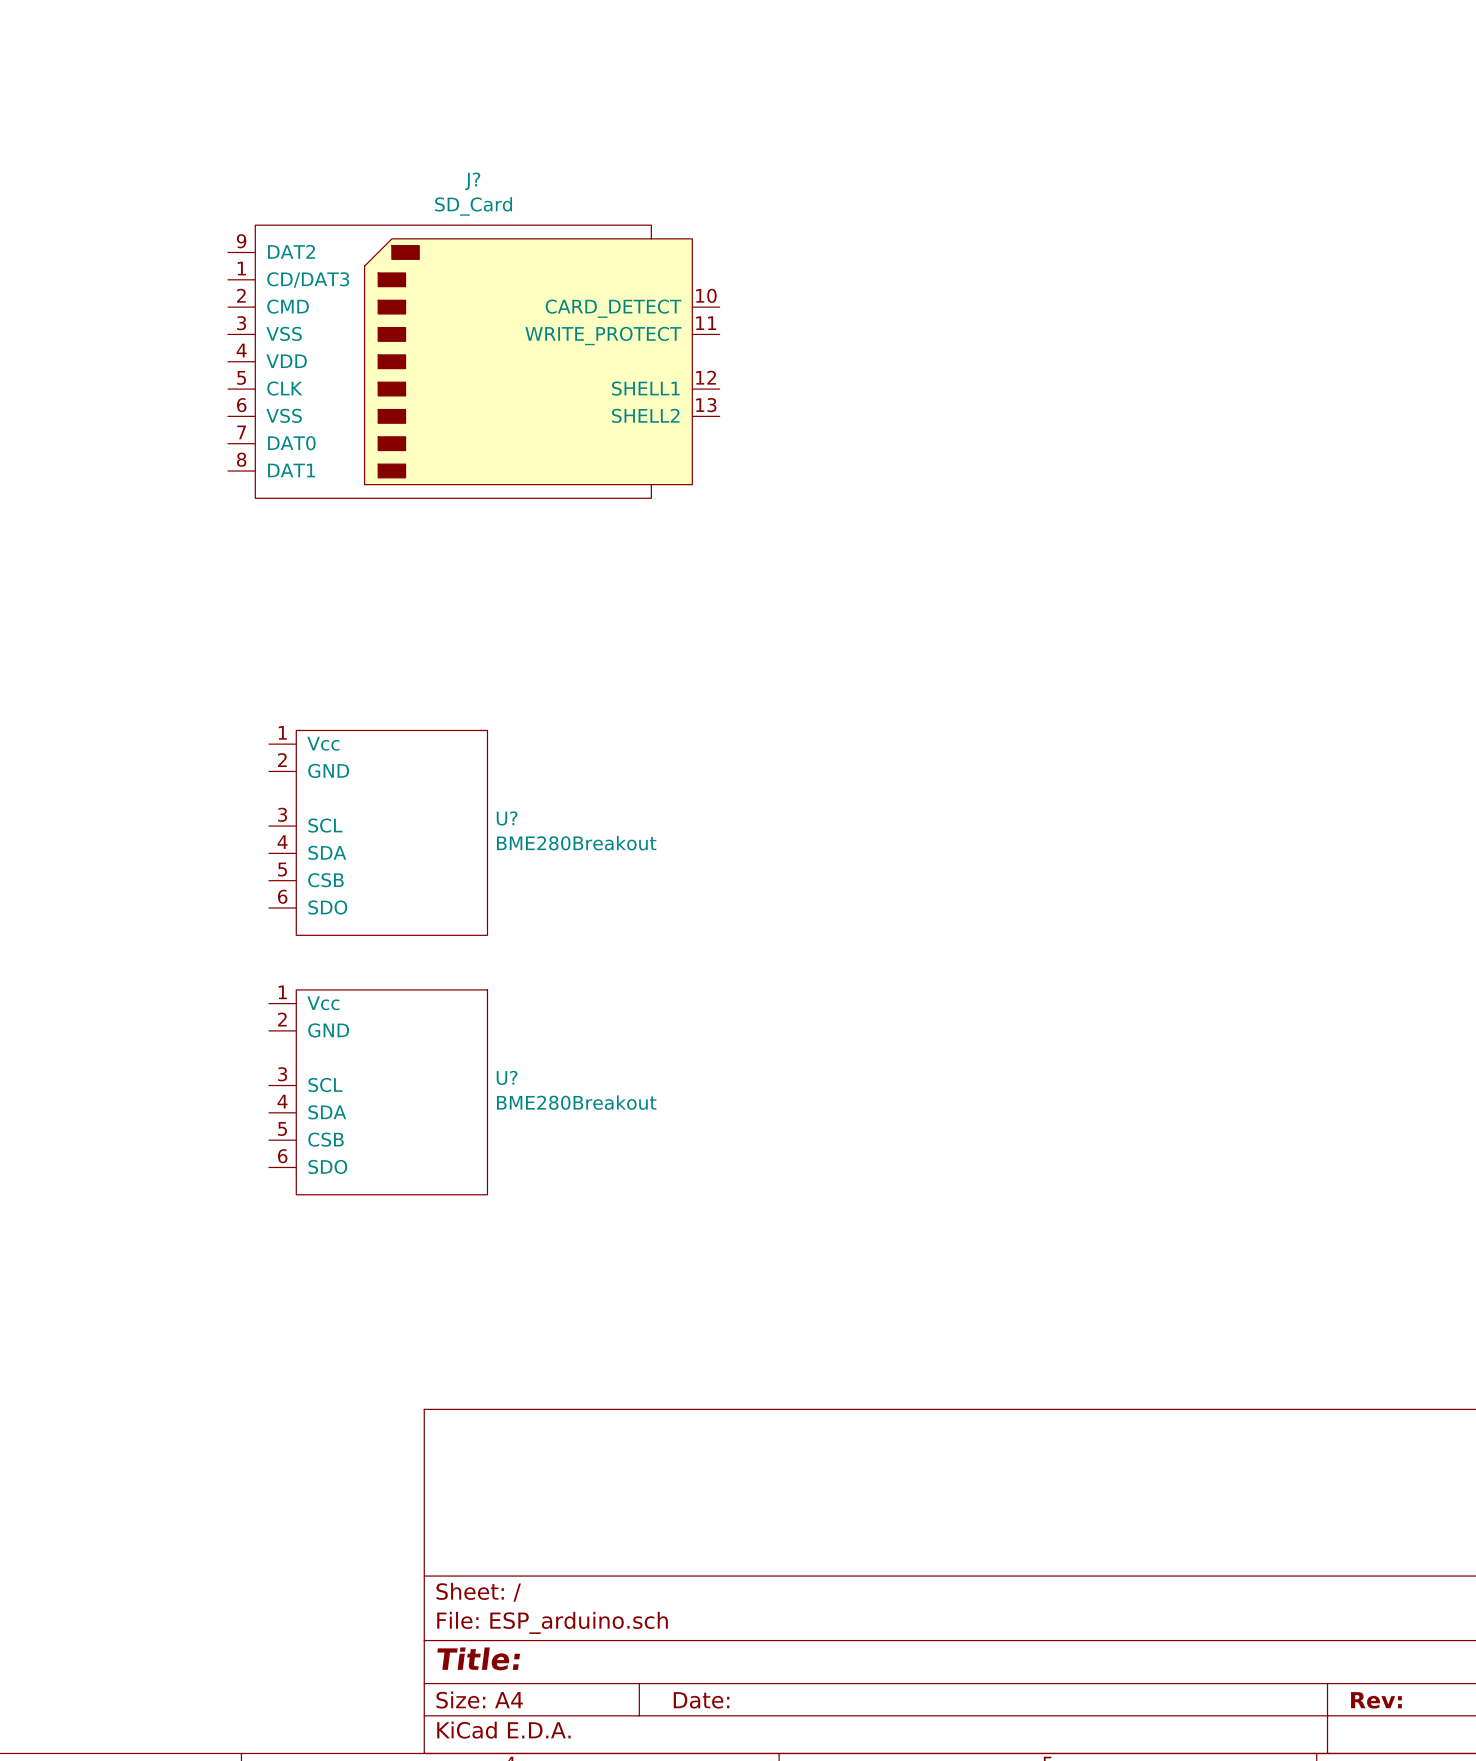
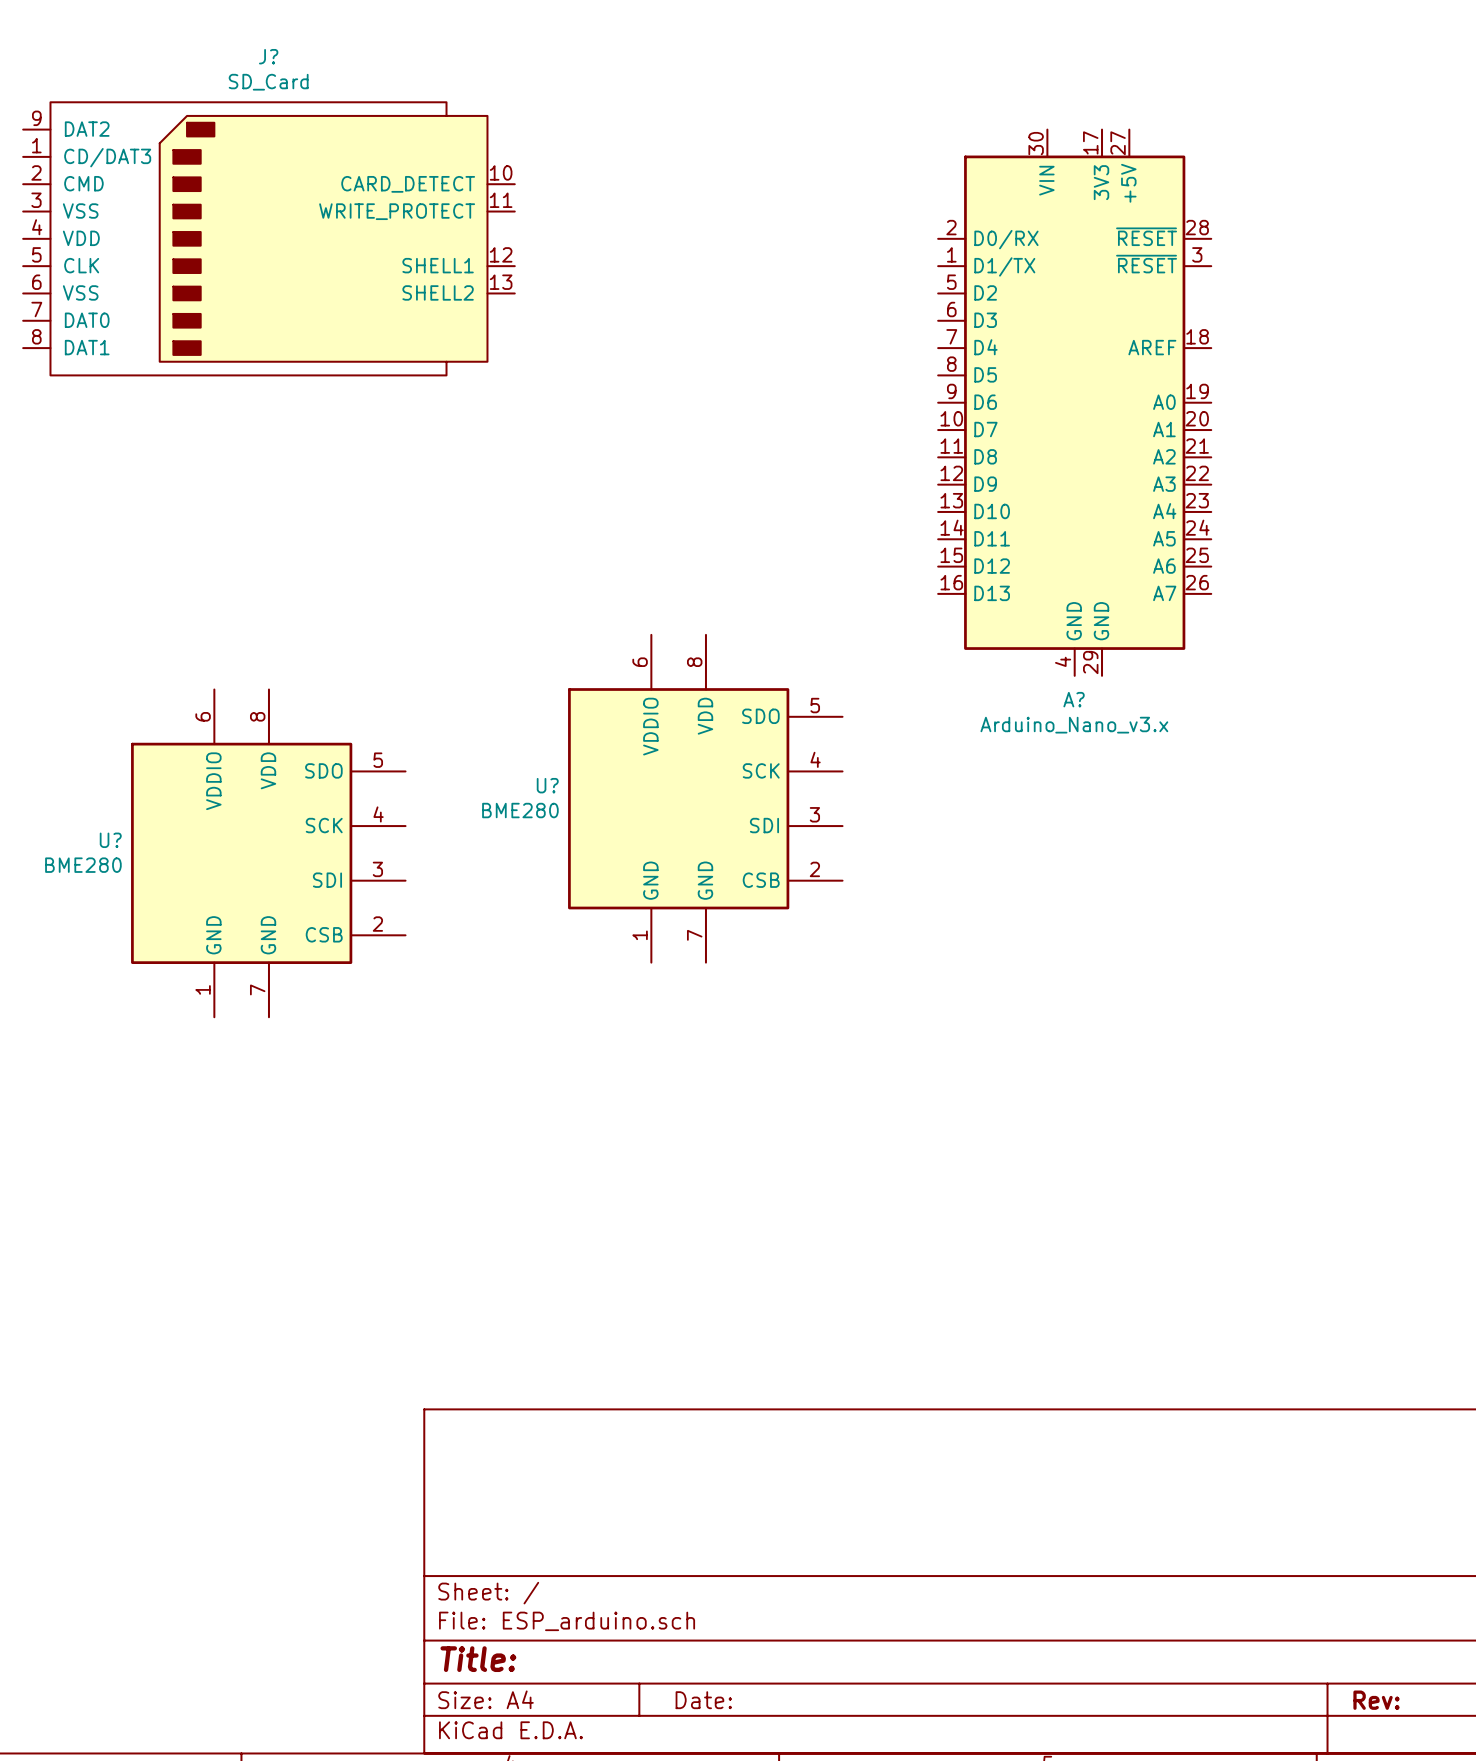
J? position: (473, 361) -> (268, 238)
A?: none -> Arduino_Nano_v3.x (1074, 402)
U?: none -> BME280 (705, 798)
U?: BME280Breakout (378, 832) -> none
U?: none -> BME280 (268, 853)
U?: BME280Breakout (378, 1092) -> none

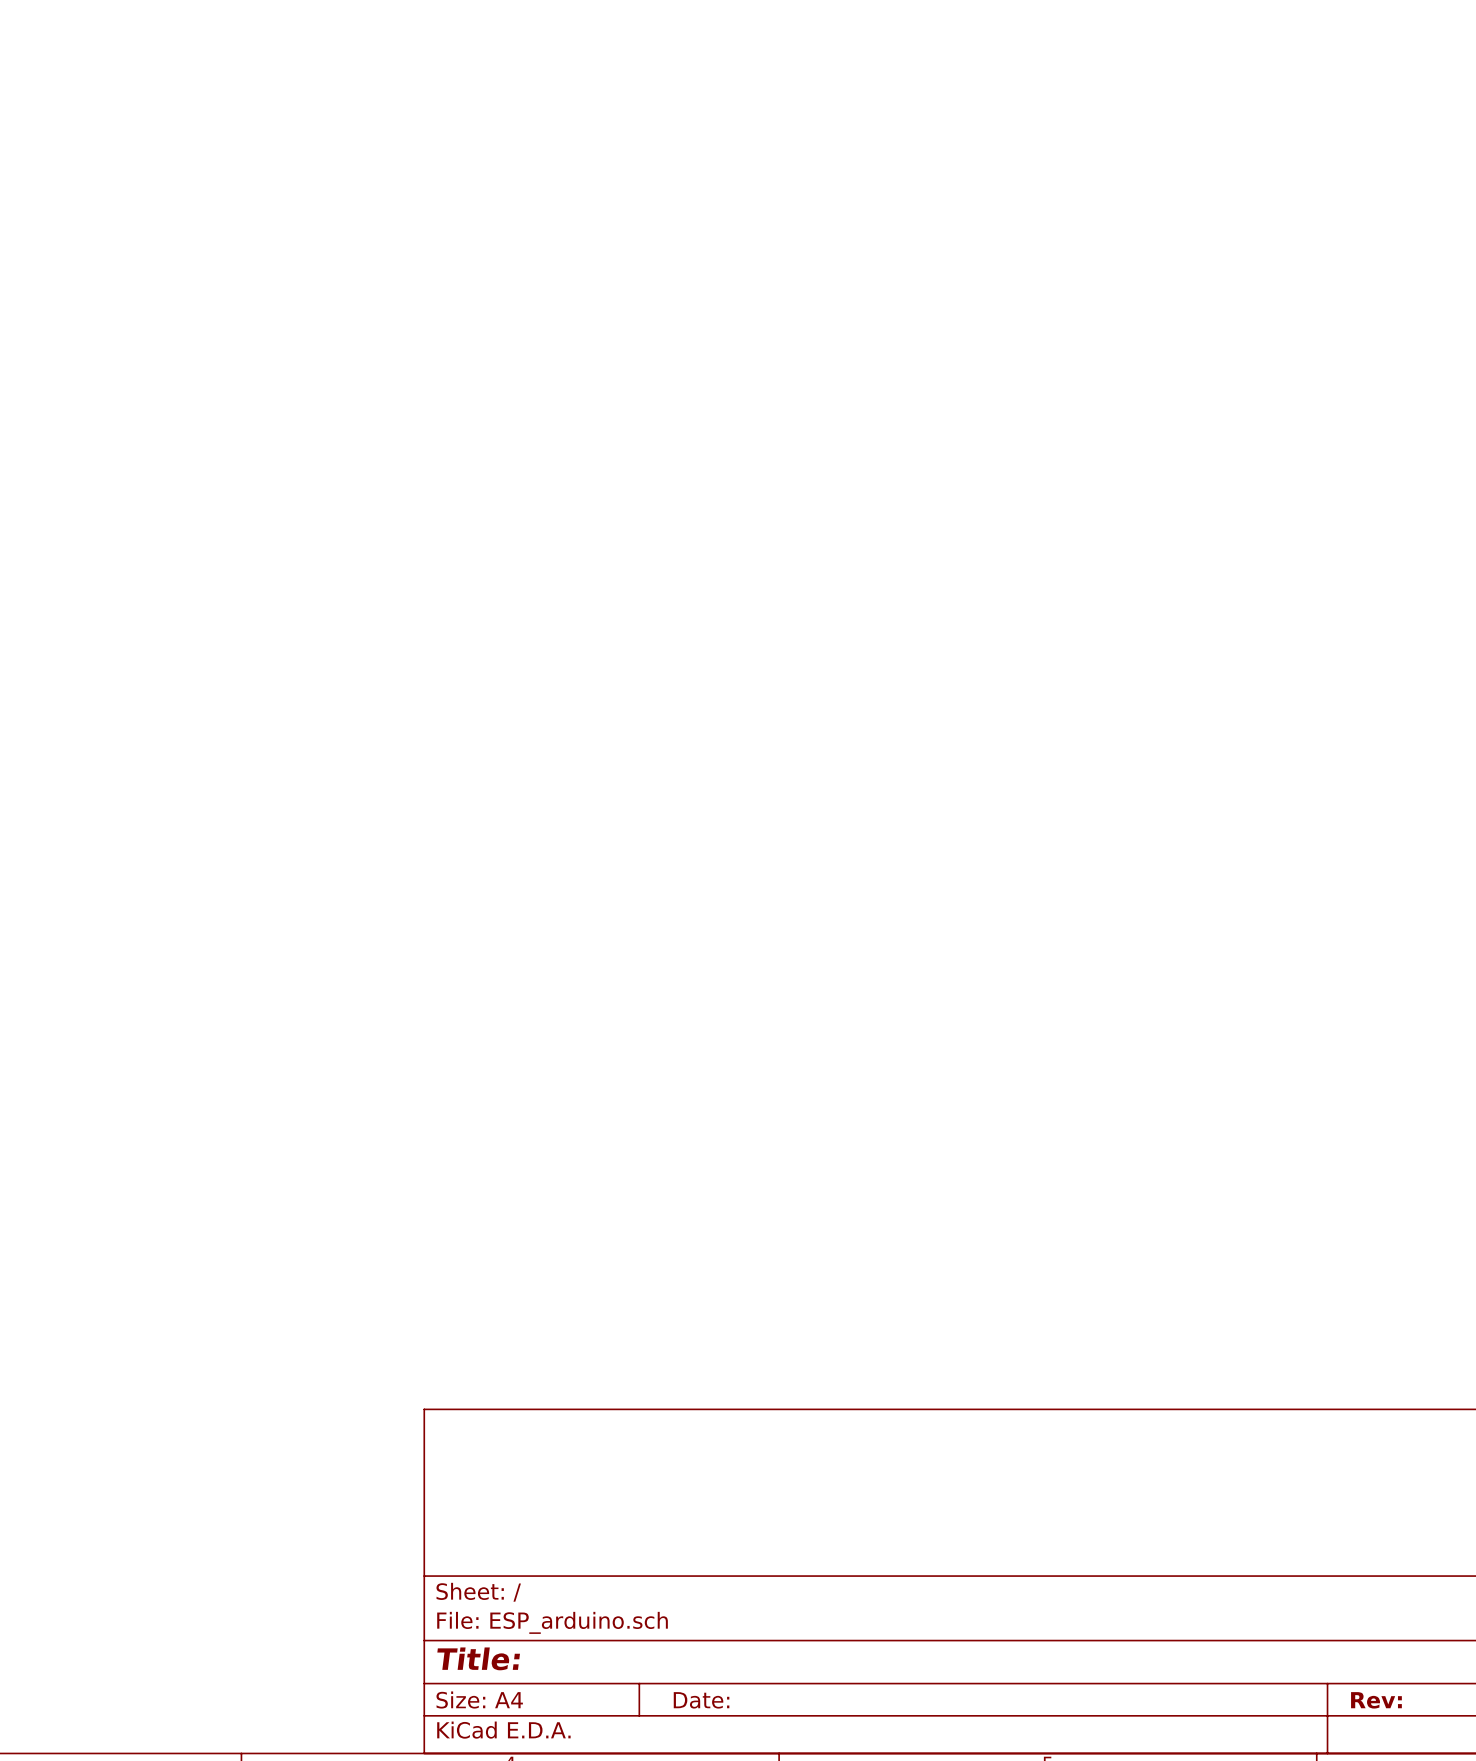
J?: SD_Card (268, 238) -> none
A?: Arduino_Nano_v3.x (1074, 402) -> none
U?: BME280 (705, 798) -> none
U?: BME280 (268, 853) -> none

